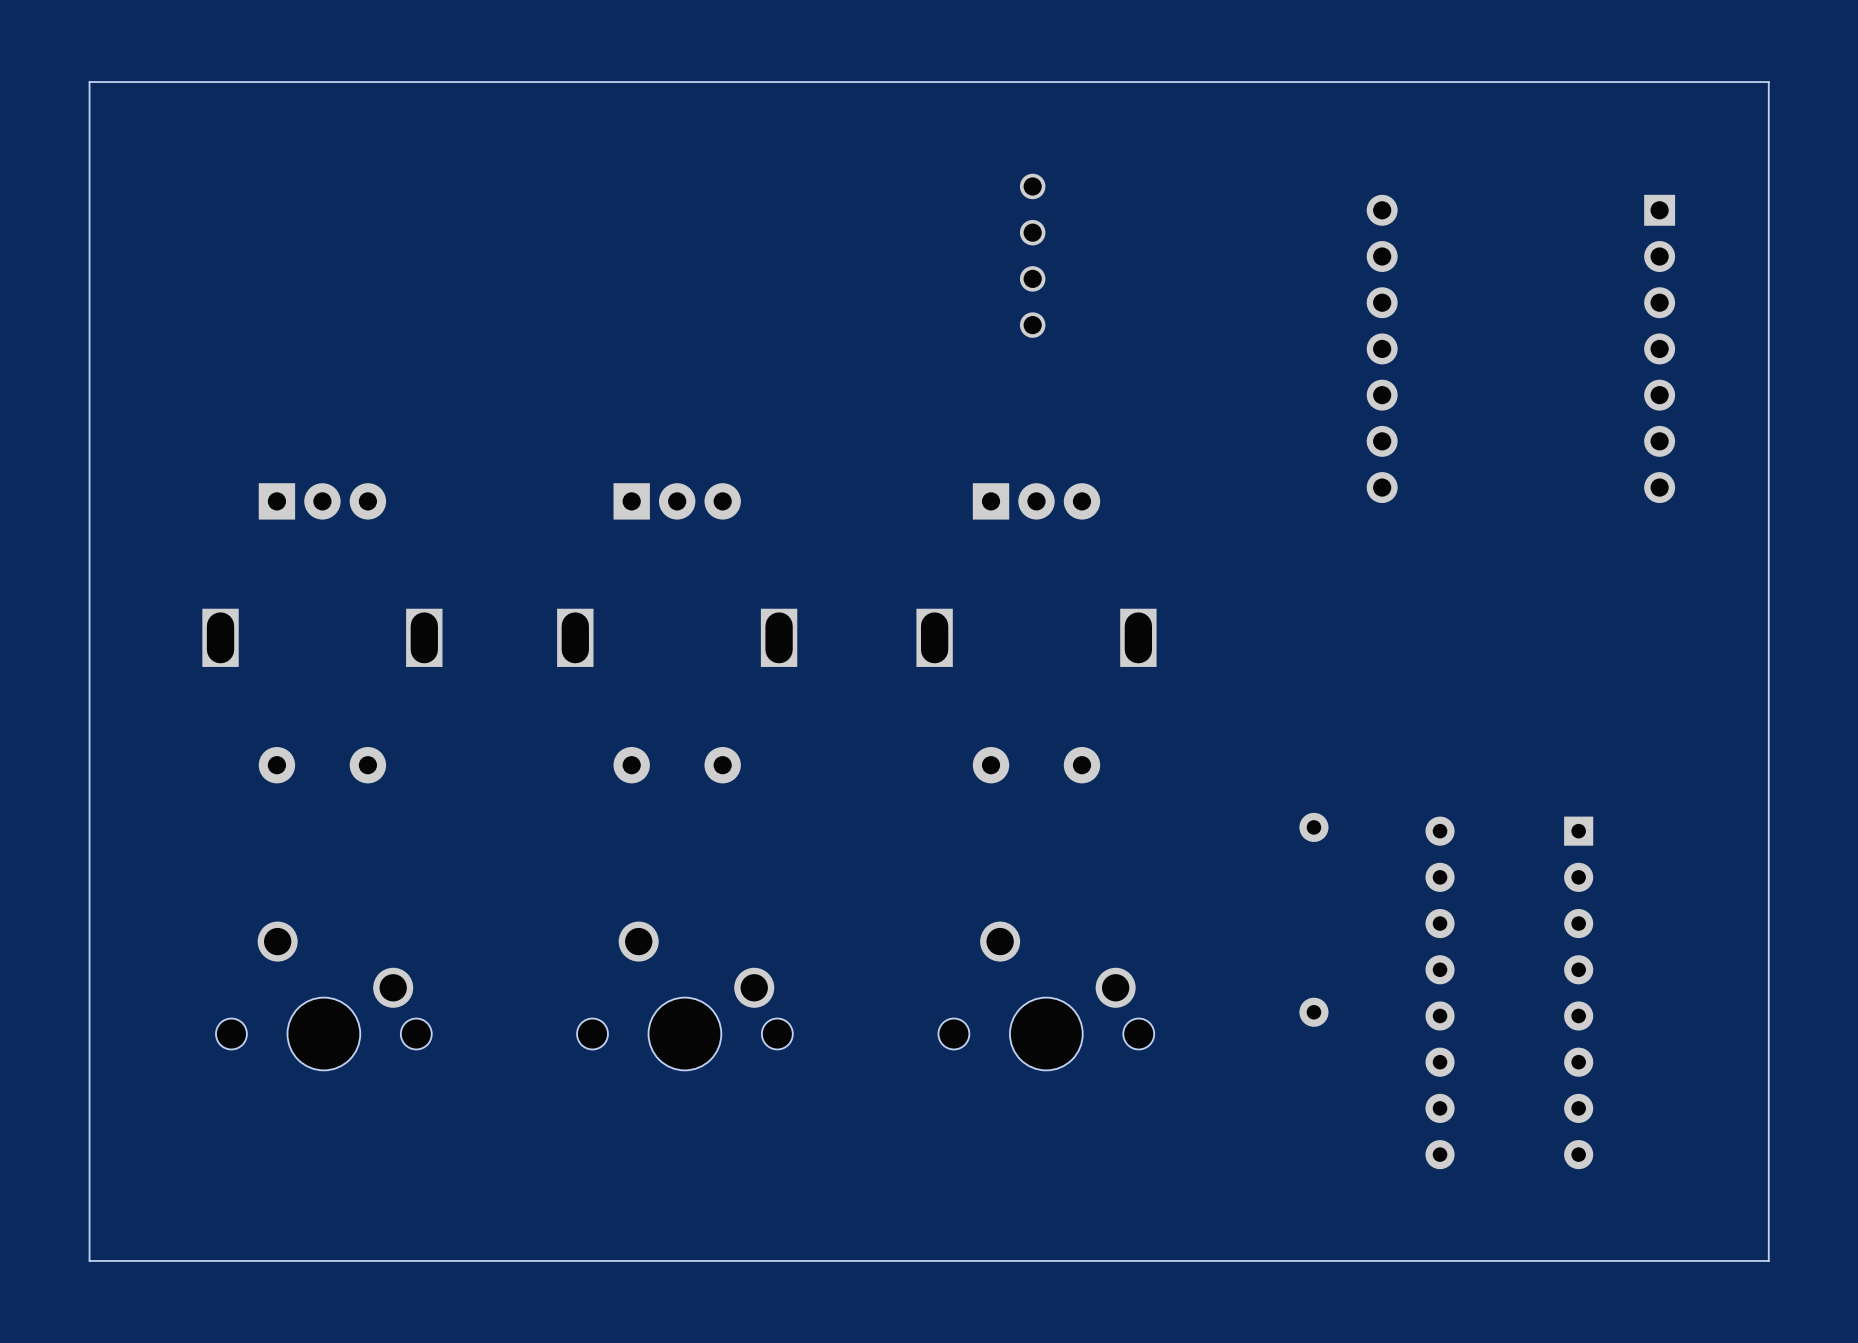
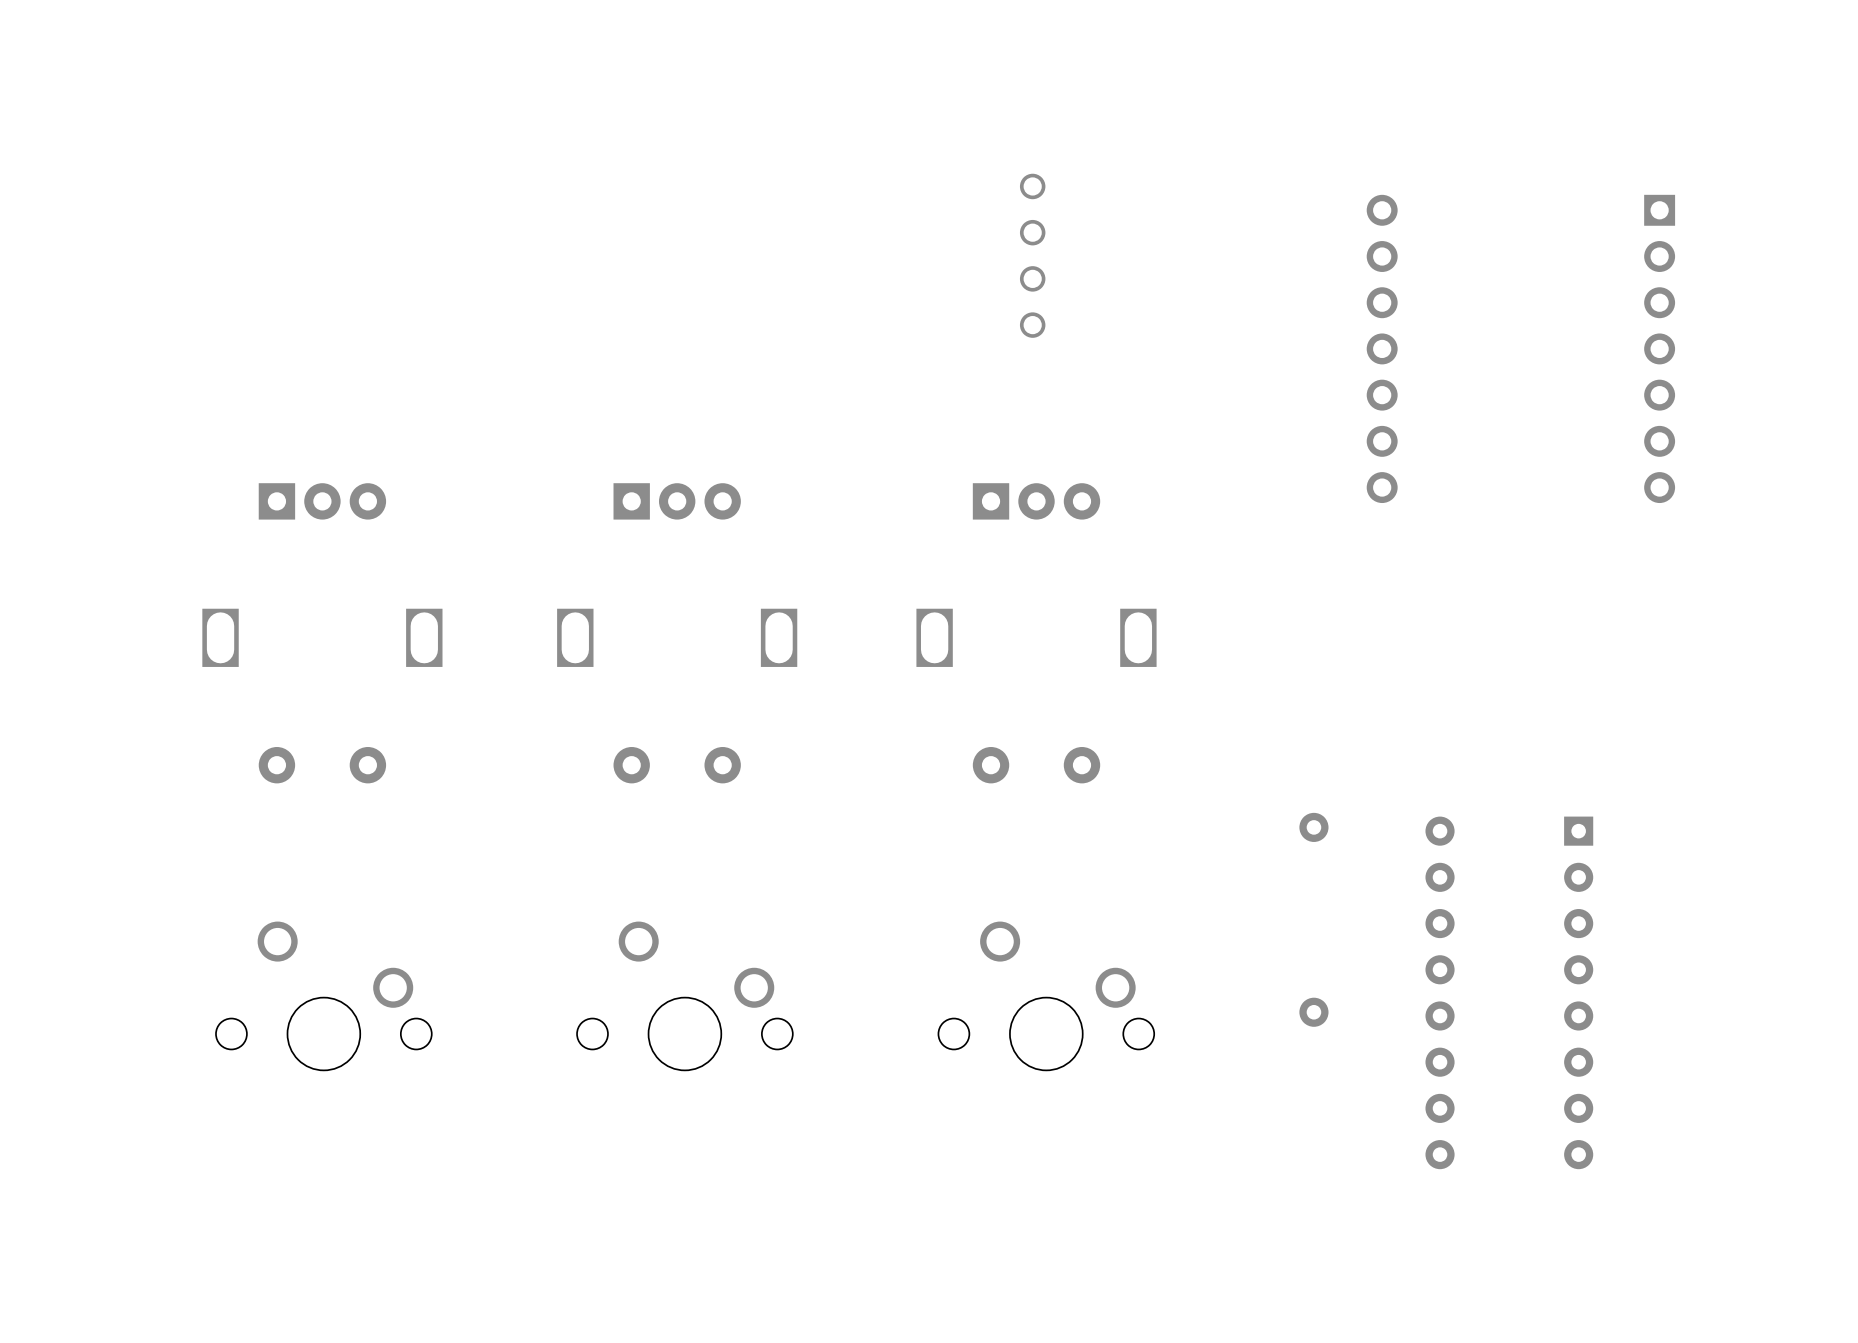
board edge: (1768, 82) (89, 82) (89, 1260) (1768, 1260) (1768, 82) -> none

